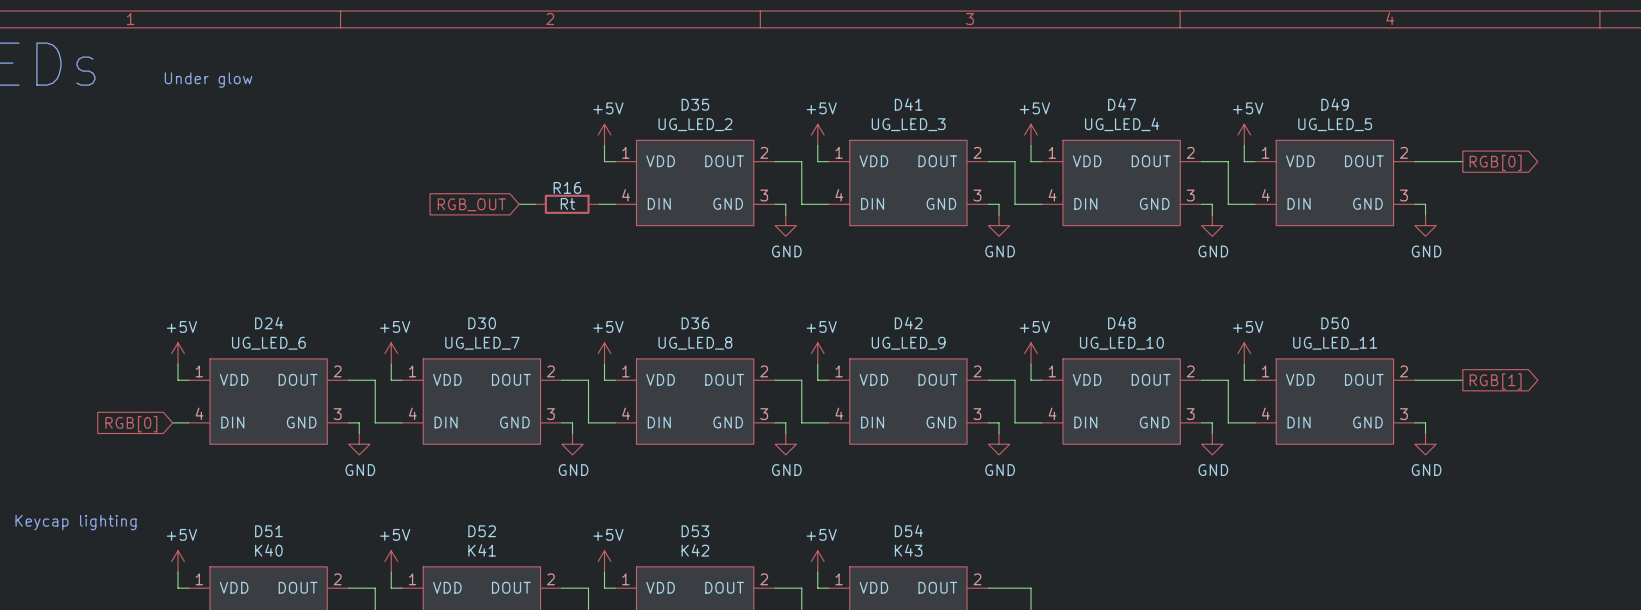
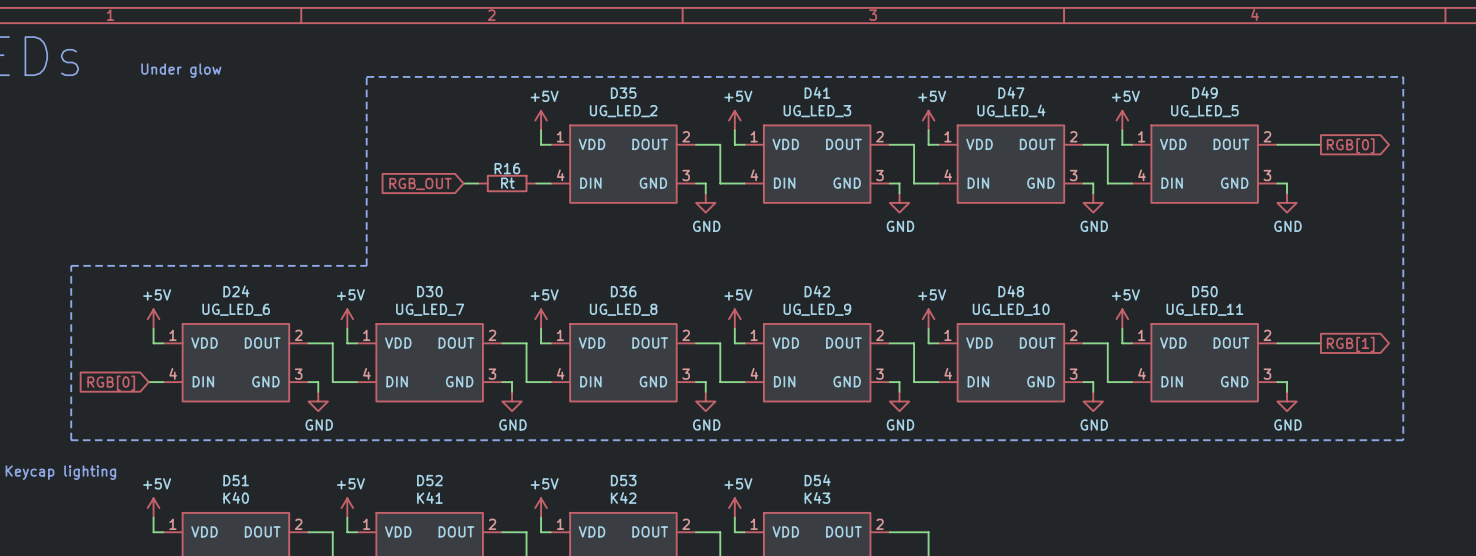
line: none -> (366, 76) (366, 265) (71, 265) (71, 440) (1403, 440) (1403, 76) (366, 76)

